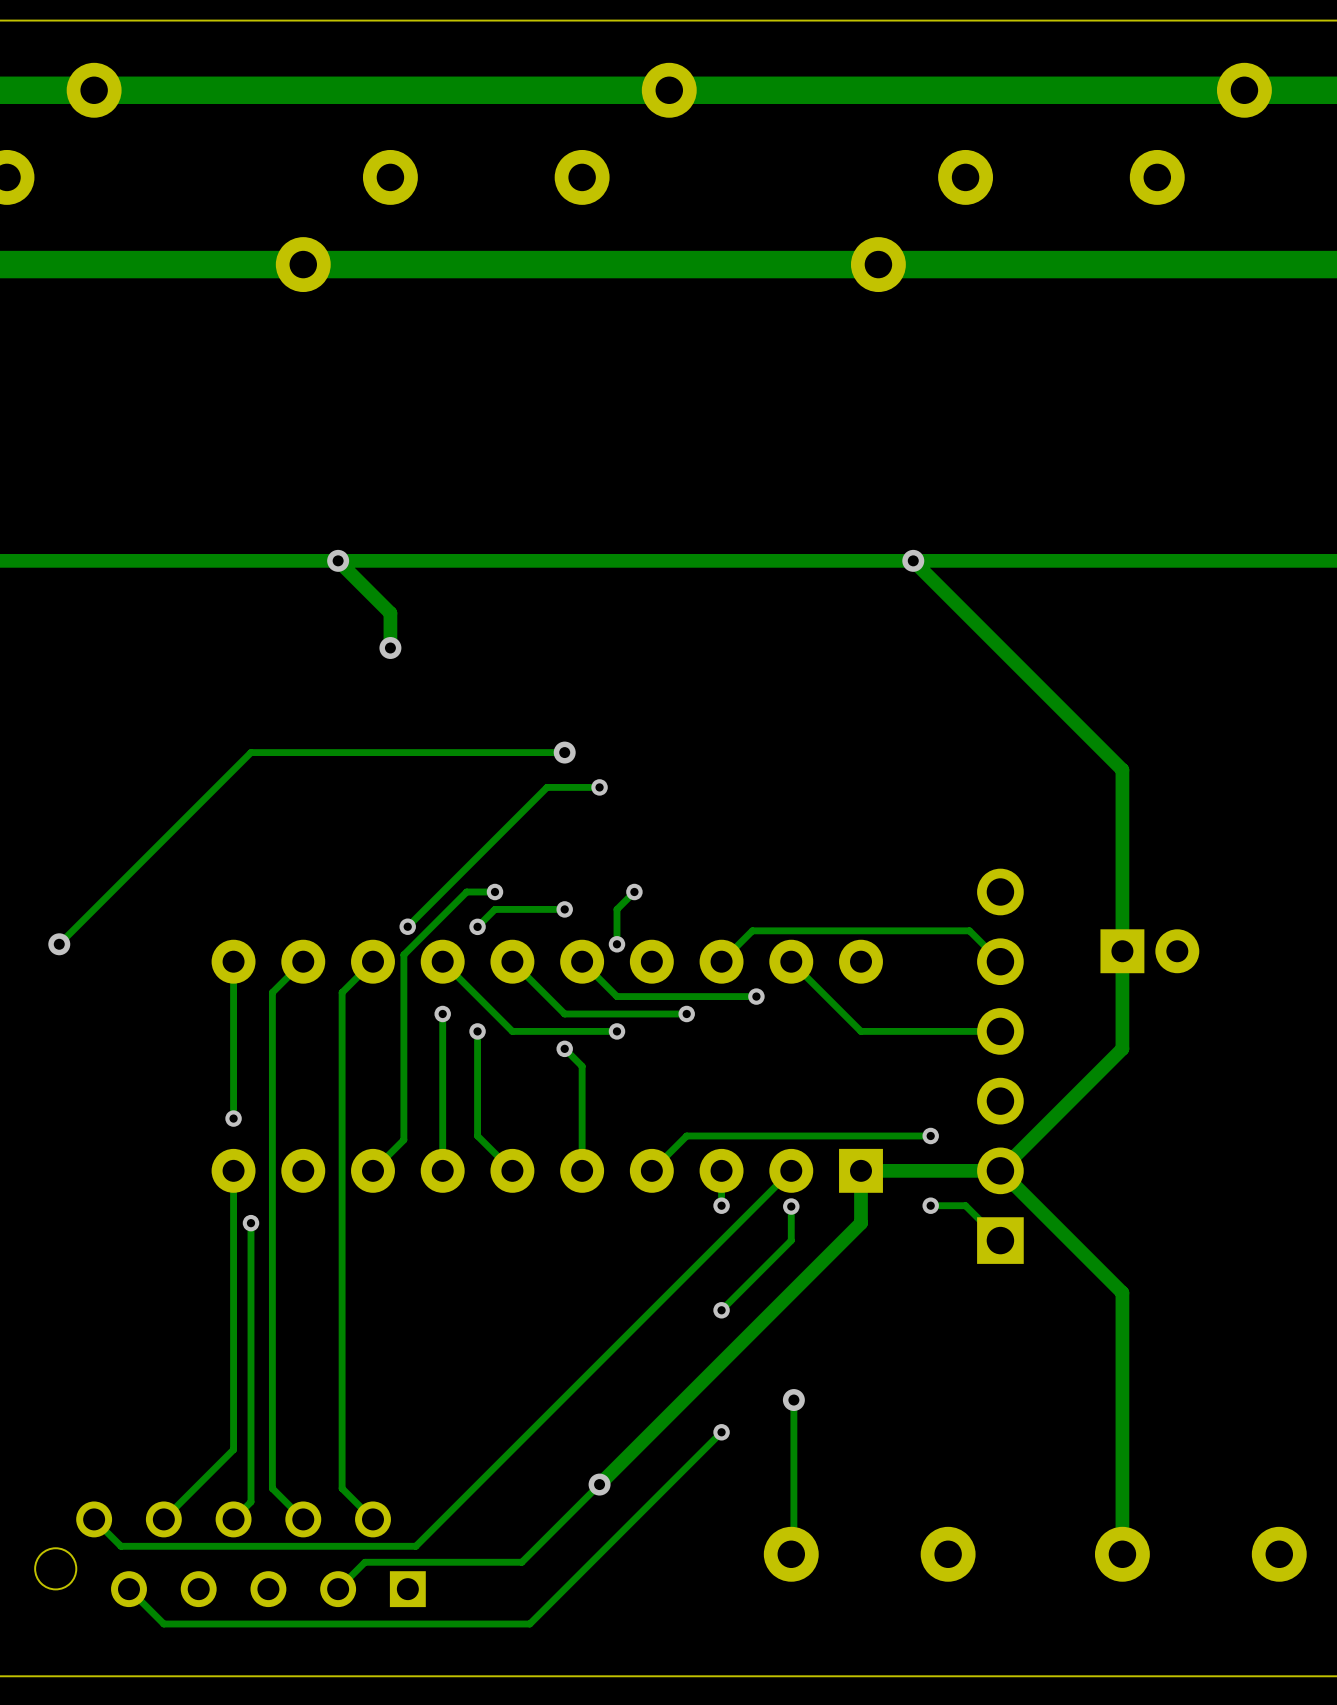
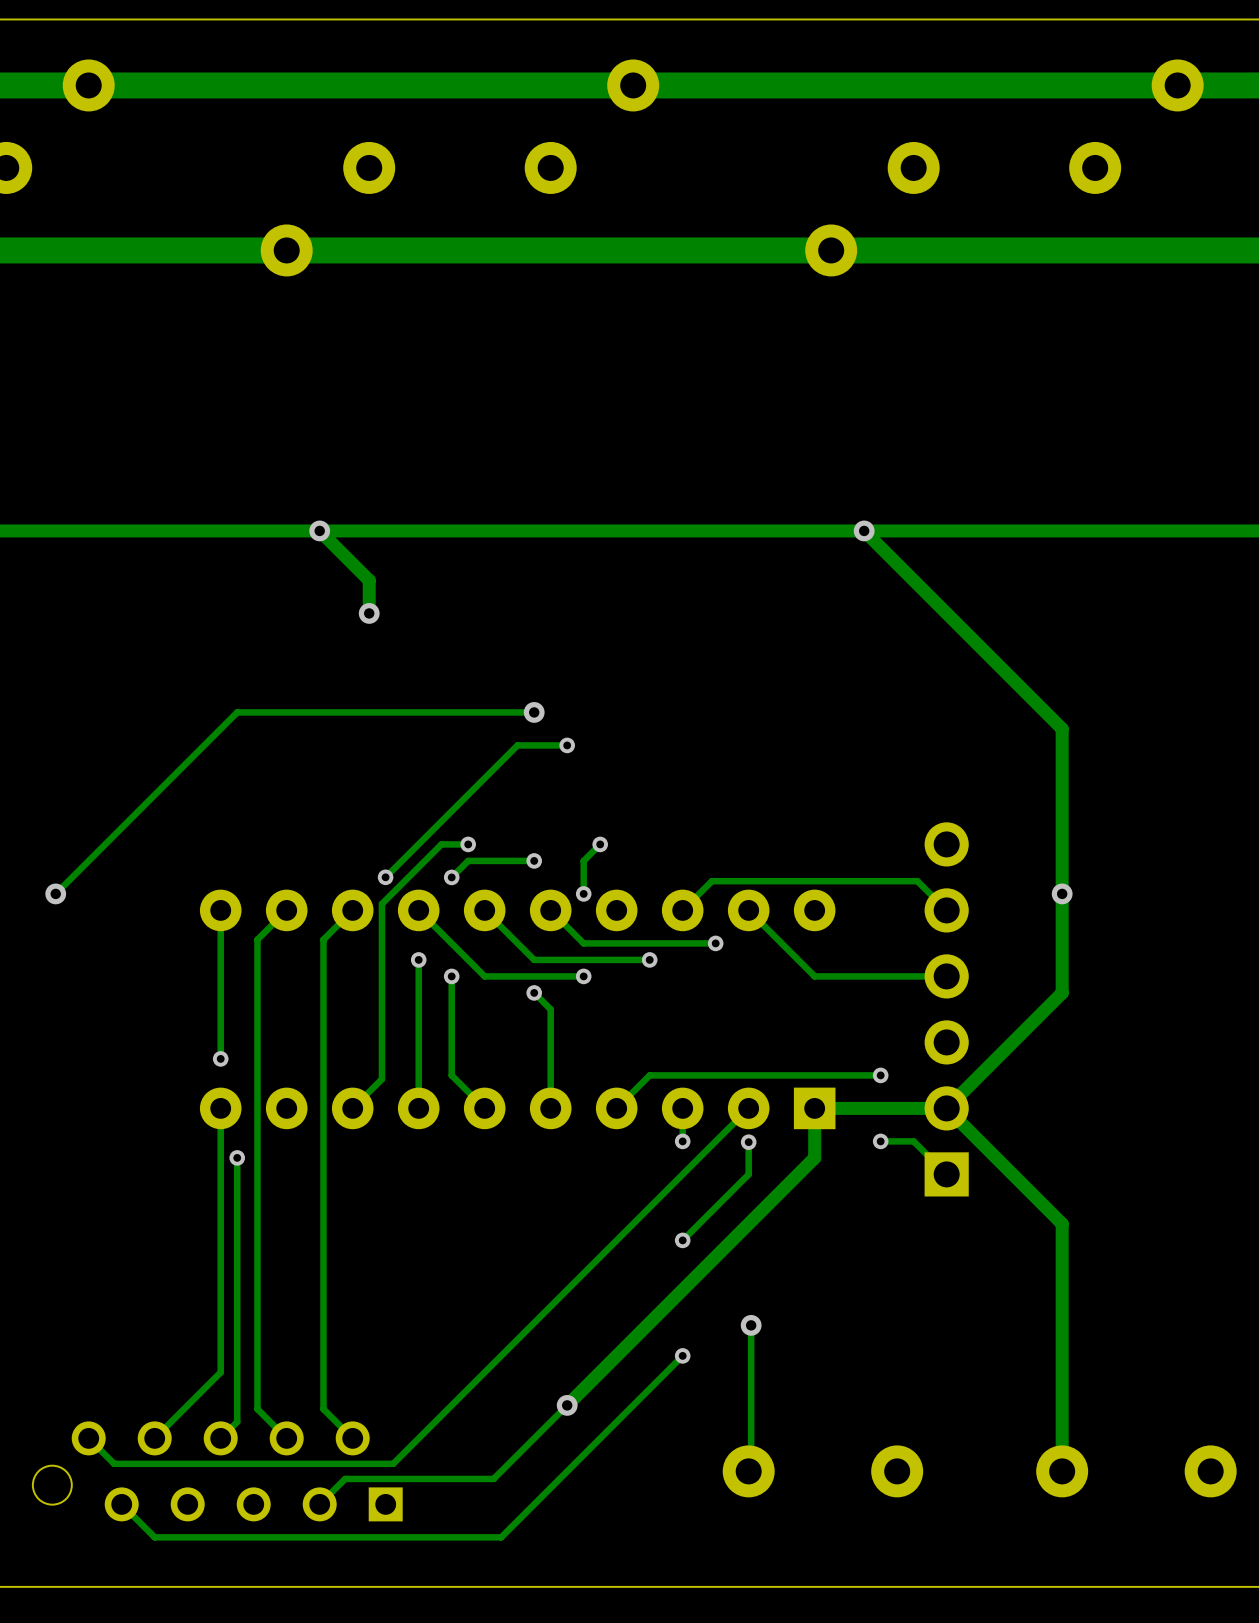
via: none -> (1062, 893)
part: (1149, 951) -> none

